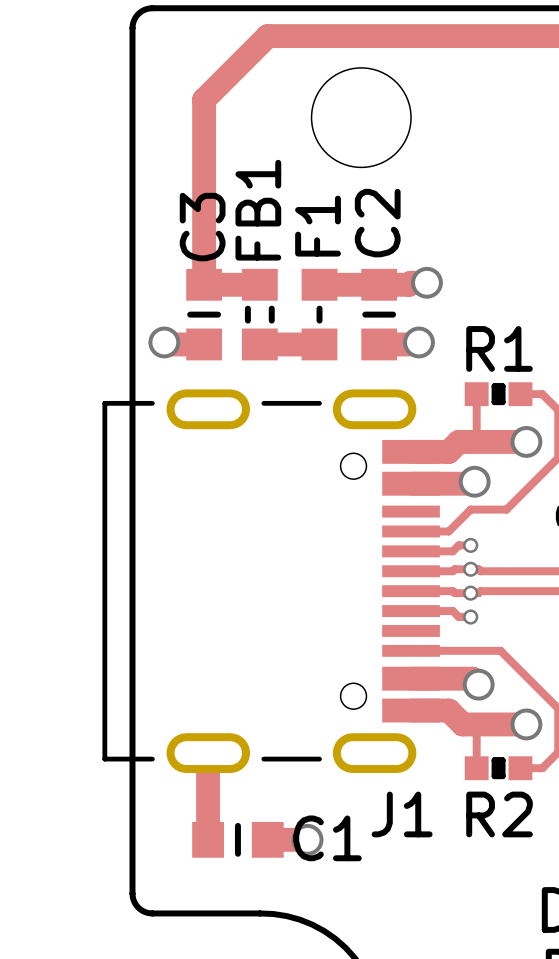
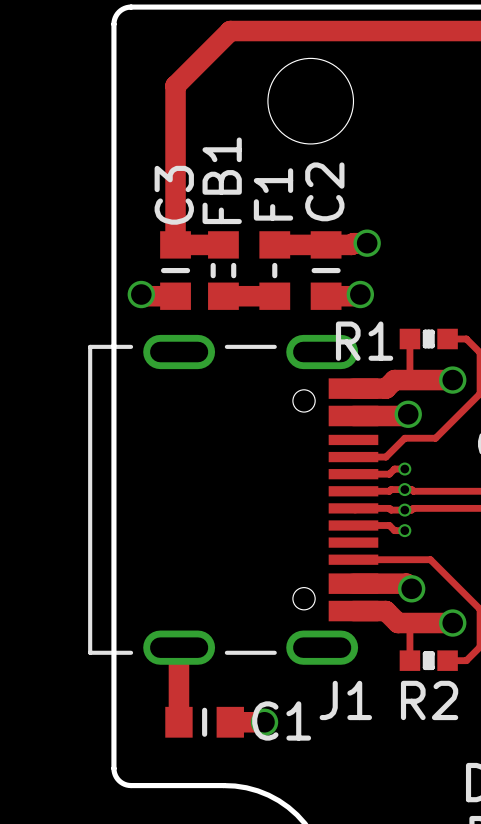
R1 name position: R1 (499, 348) -> R1 (364, 341)

